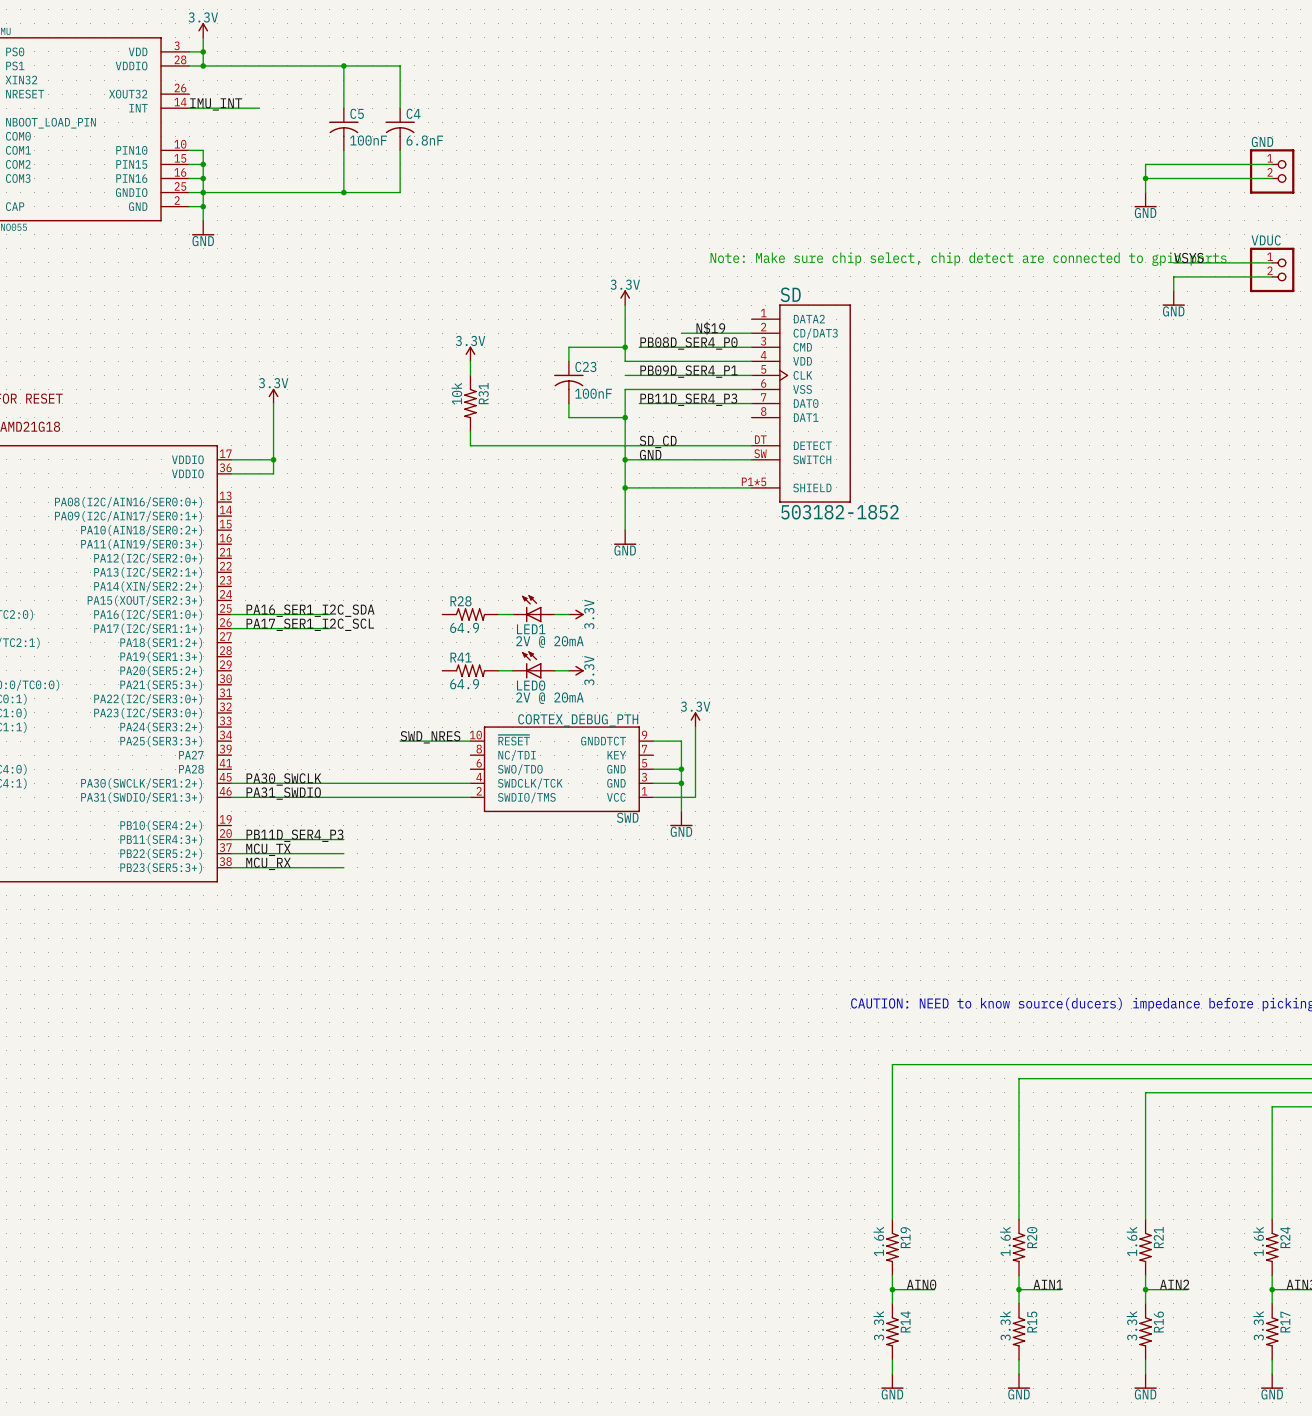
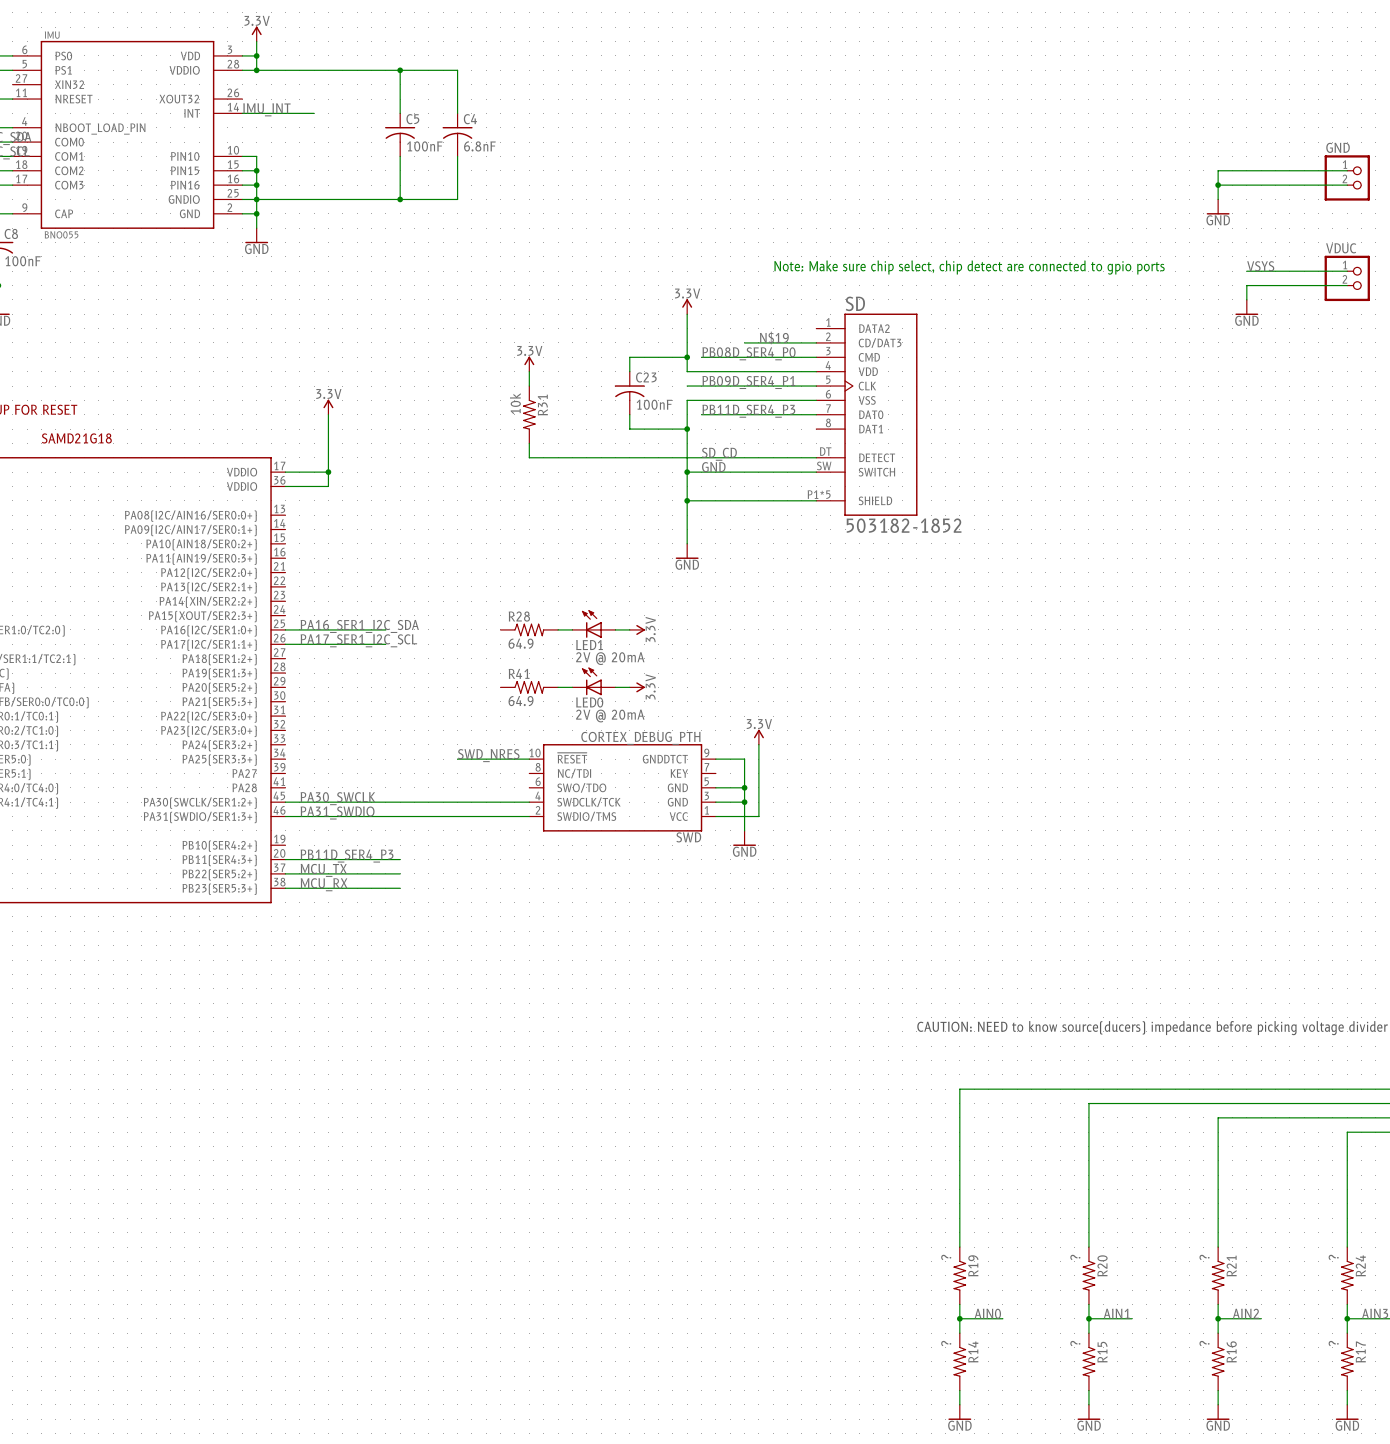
R19 value: 1.6k (878, 1241) -> ? (946, 1257)
R20 value: 1.6k (1005, 1241) -> ? (1075, 1257)
R21 value: 1.6k (1132, 1241) -> ? (1204, 1257)
R24 value: 1.6k (1258, 1241) -> ? (1333, 1257)
R14 value: 3.3k (878, 1325) -> ? (946, 1343)
R15 value: 3.3k (1005, 1325) -> ? (1075, 1343)
R16 value: 3.3k (1132, 1325) -> ? (1204, 1343)
R17 value: 3.3k (1258, 1325) -> ? (1333, 1343)

